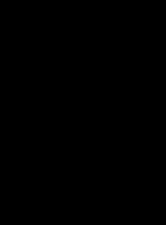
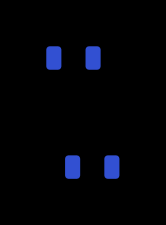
part: none -> (73, 58)
part: none -> (92, 167)

